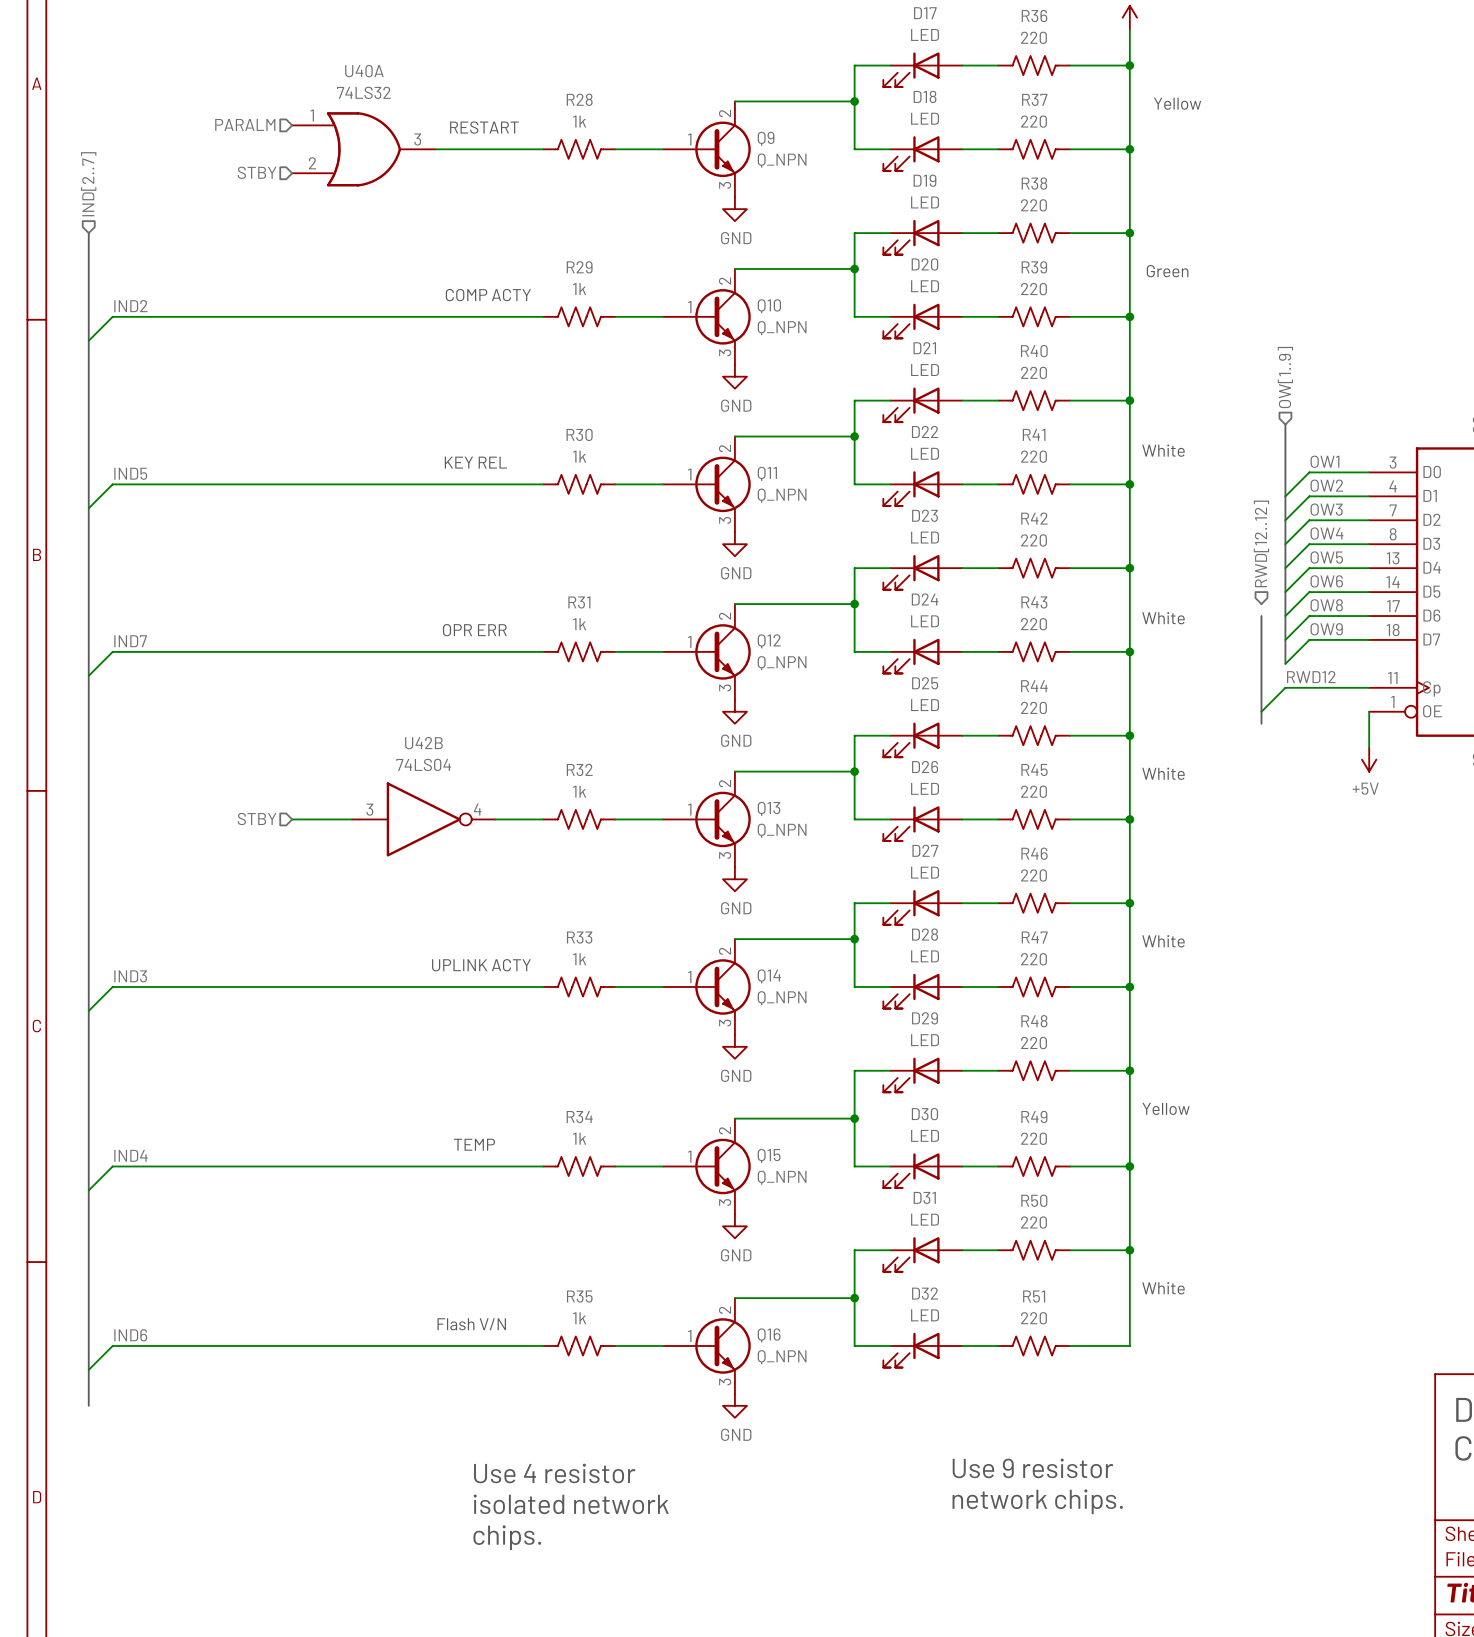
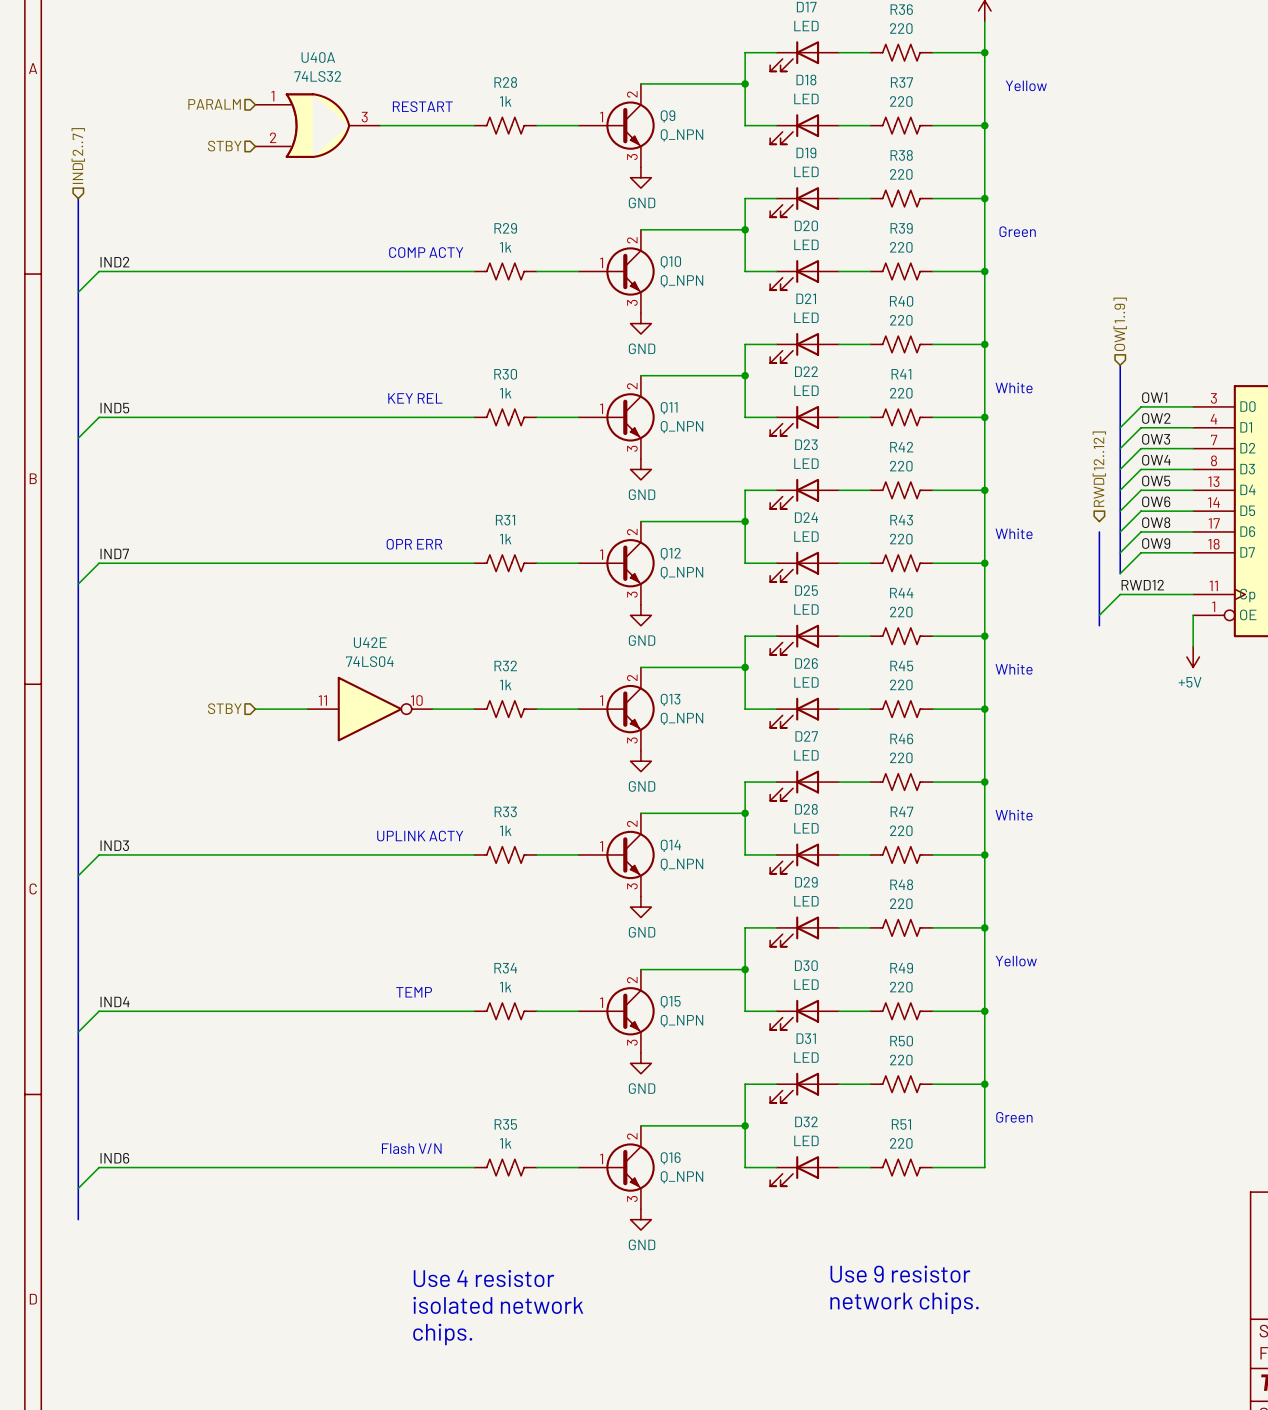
U42B name: U42B (423, 743) -> U42E (370, 642)
U42B pin number: 3 (369, 809) -> 11 (322, 700)
U42B pin number: 4 (477, 809) -> 10 (416, 700)
text: White (1163, 1288) -> Green (1014, 1117)

